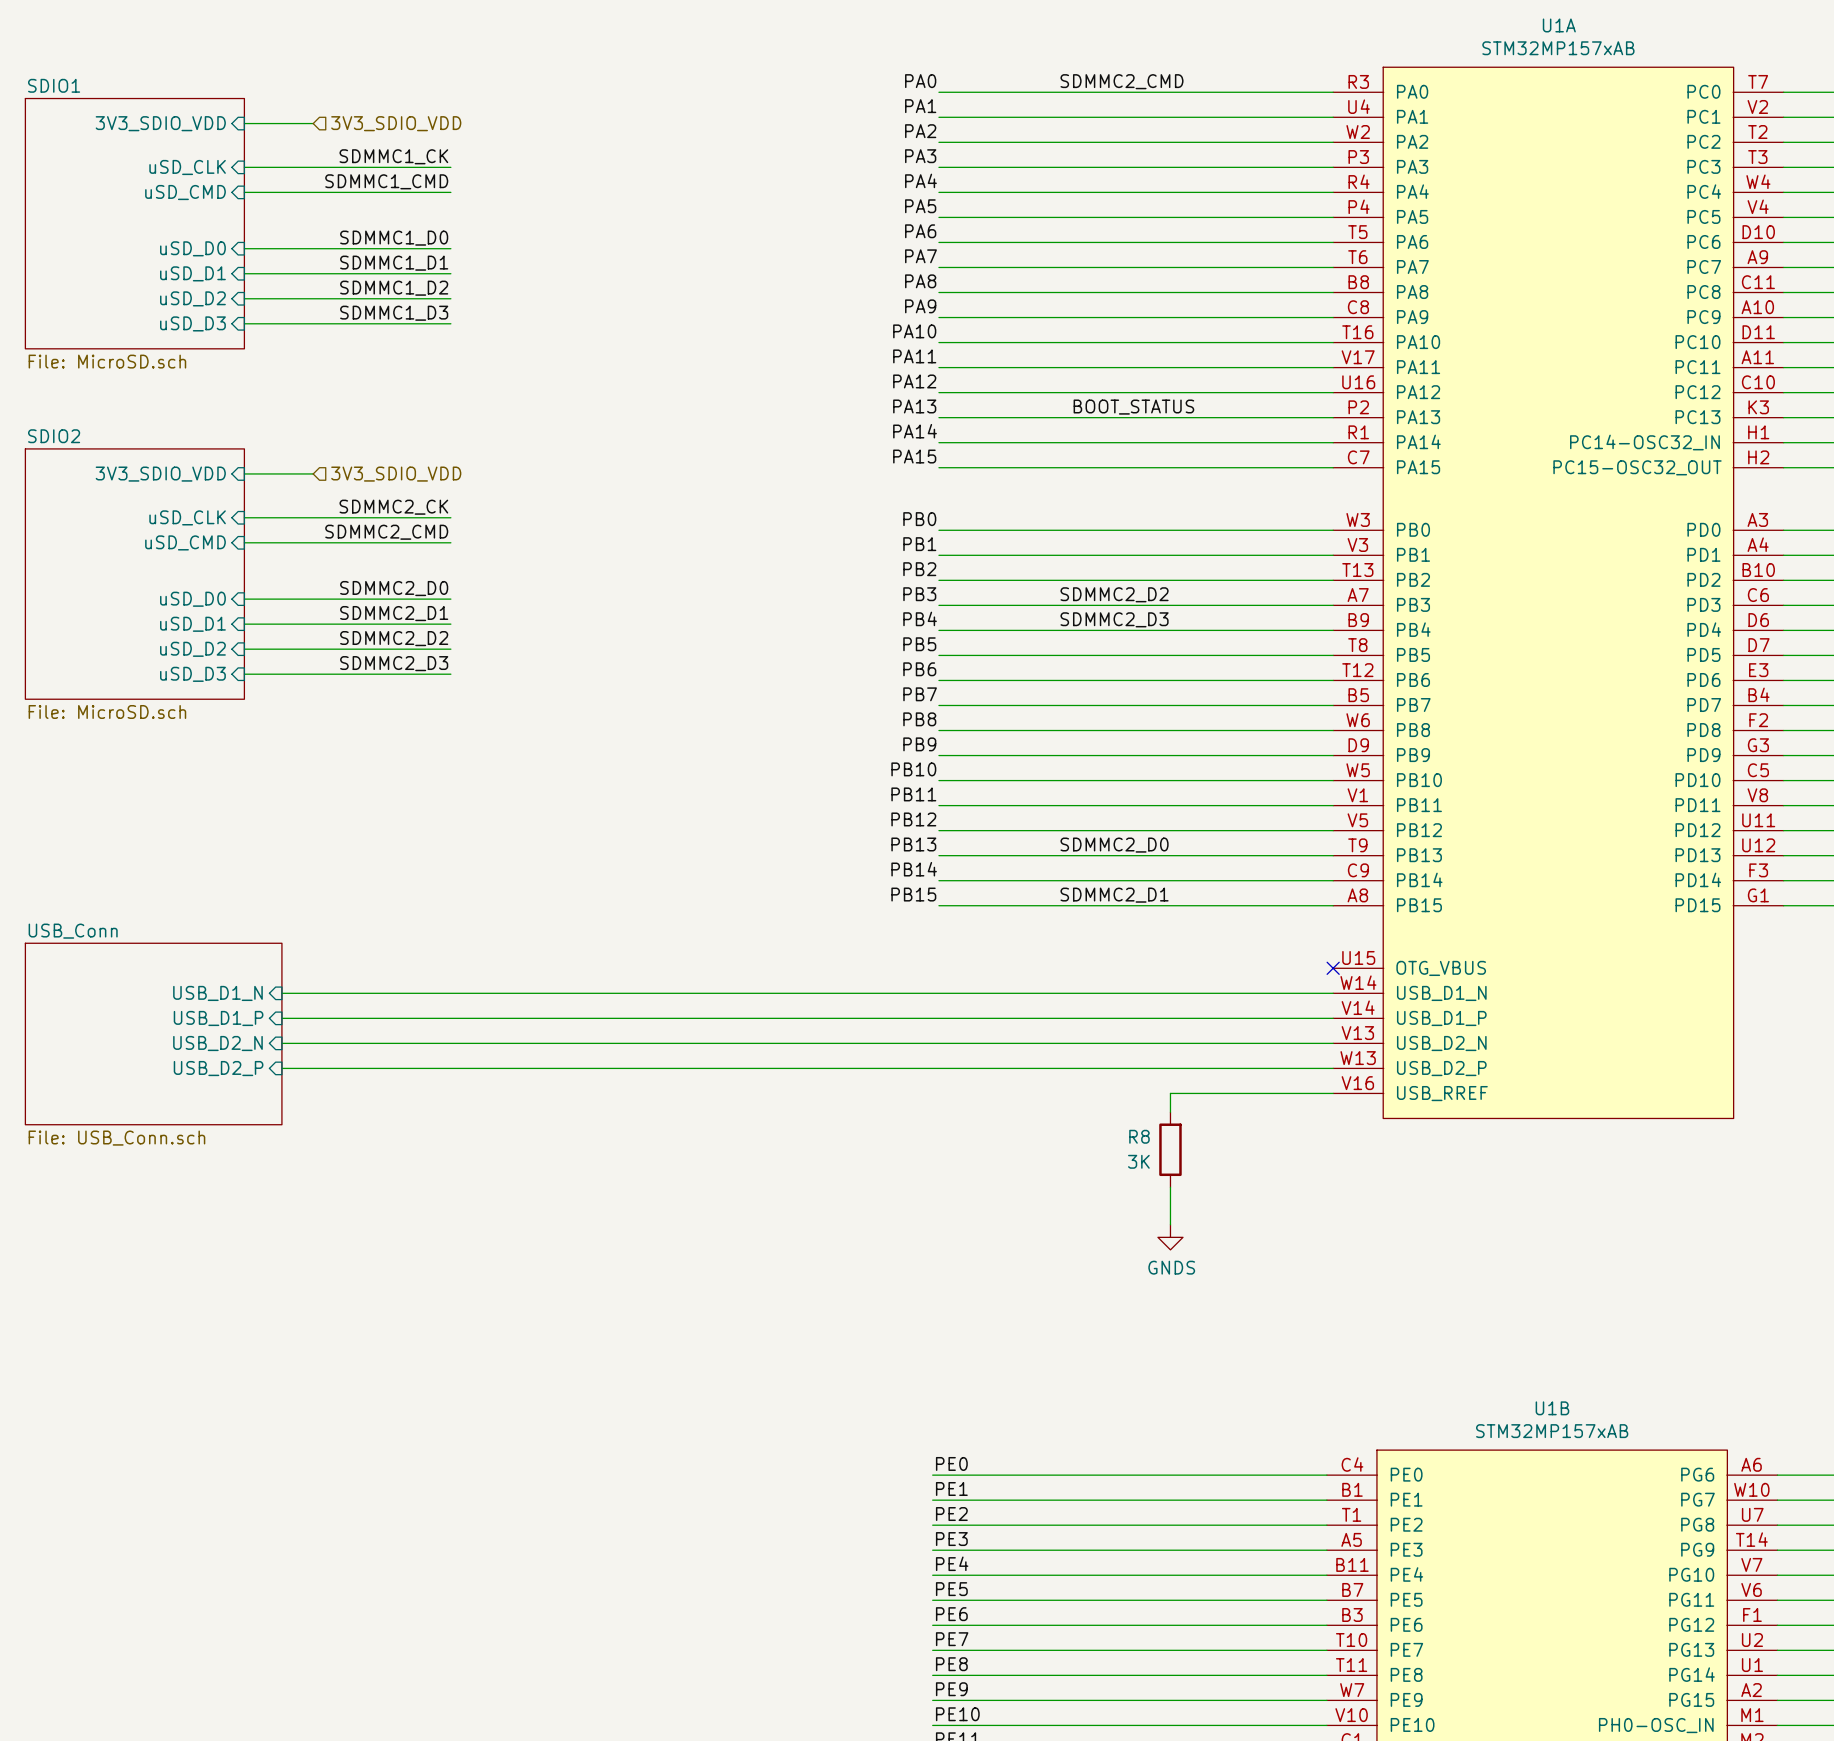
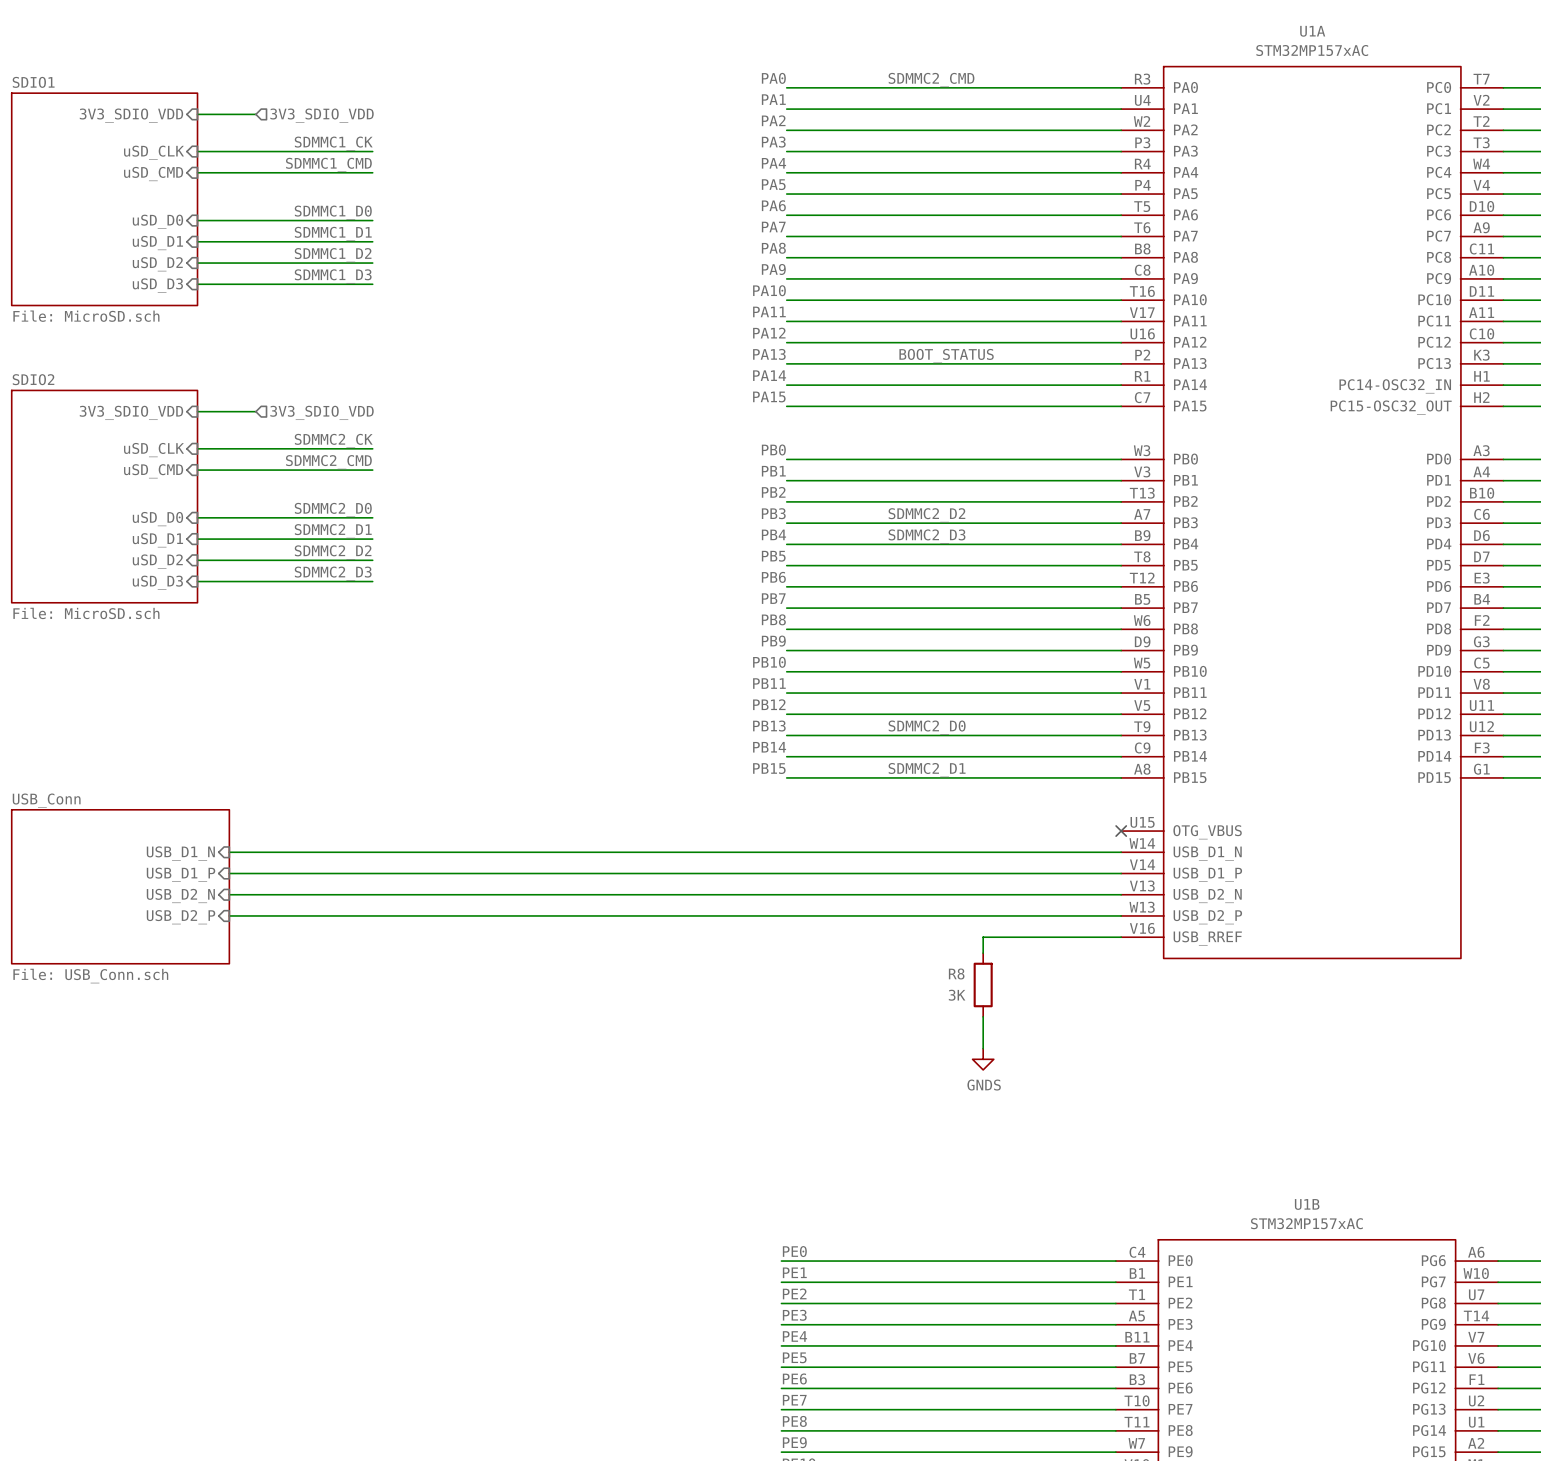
U1A value: STM32MP157xAB (1558, 48) -> STM32MP157xAC (1312, 50)
U1B value: STM32MP157xAB (1552, 1431) -> STM32MP157xAC (1306, 1223)

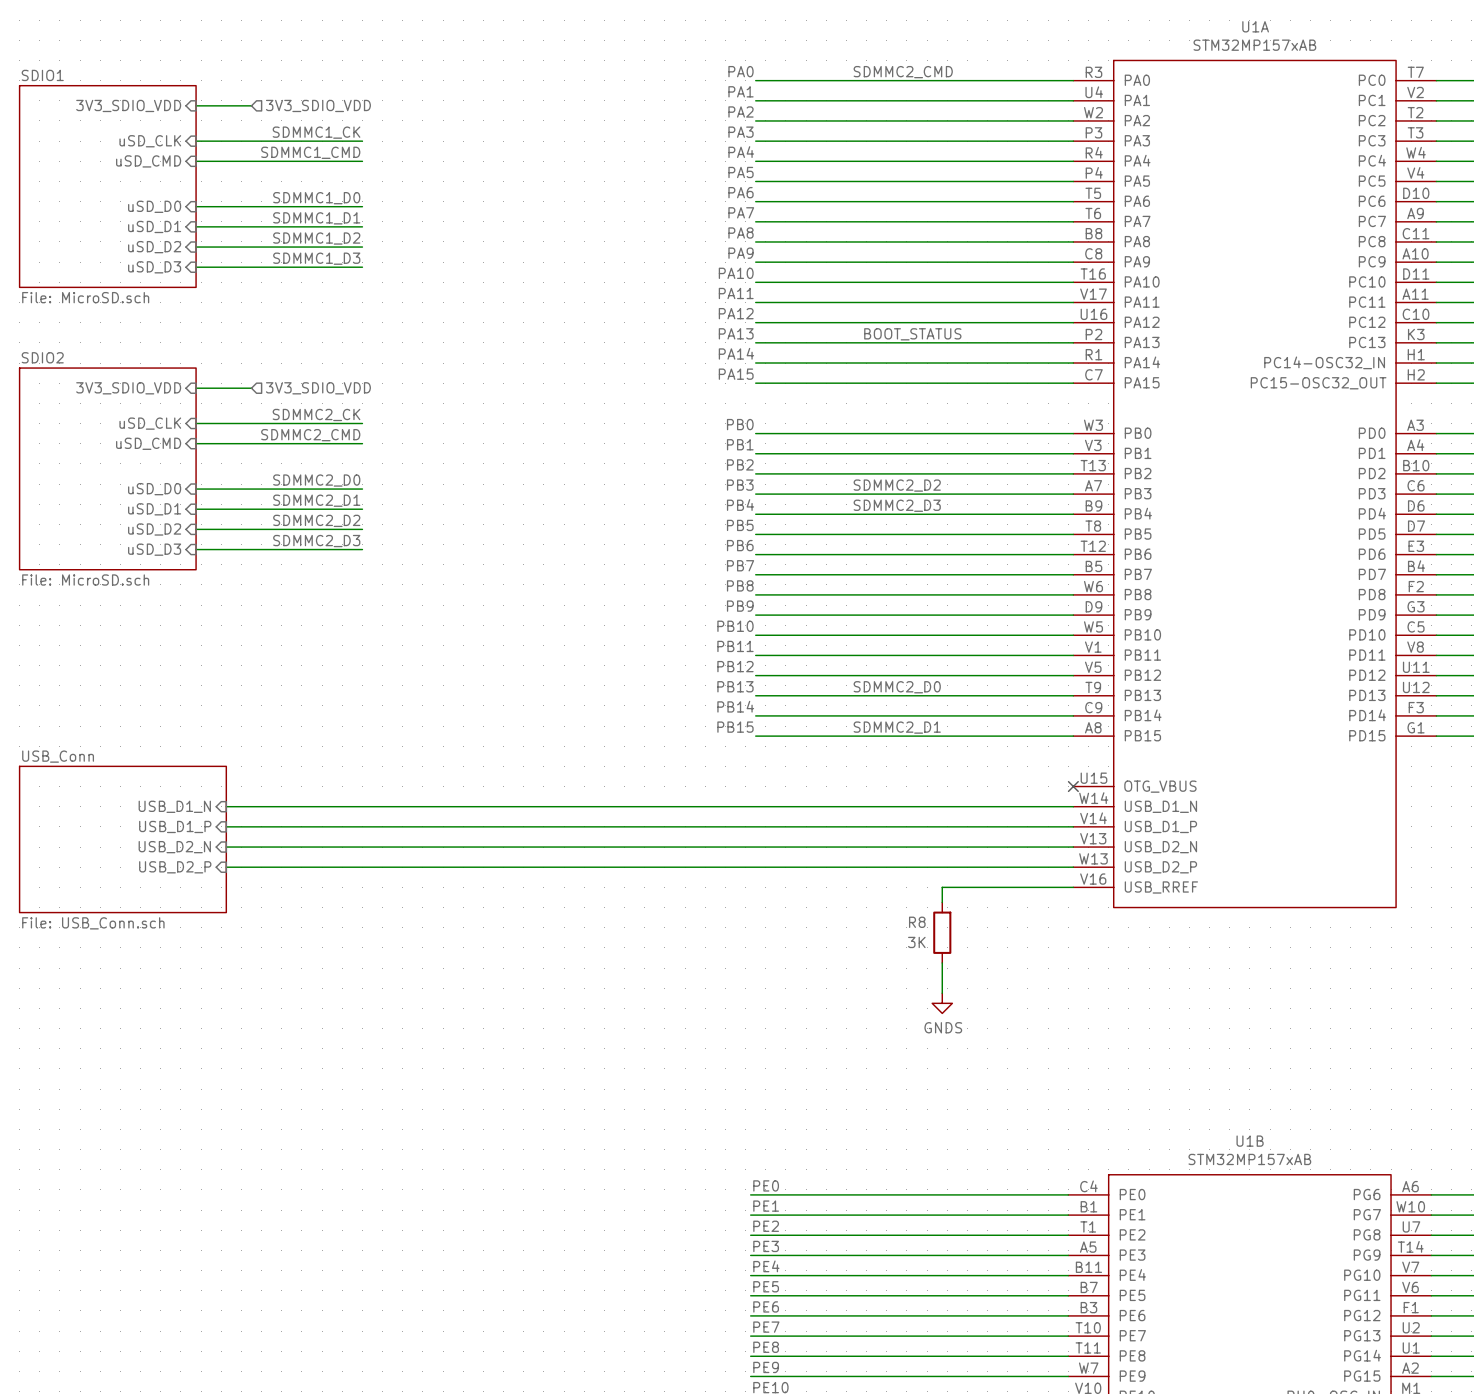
U1A value: STM32MP157xAC (1312, 50) -> STM32MP157xAB (1254, 45)
U1B value: STM32MP157xAC (1306, 1223) -> STM32MP157xAB (1249, 1159)

